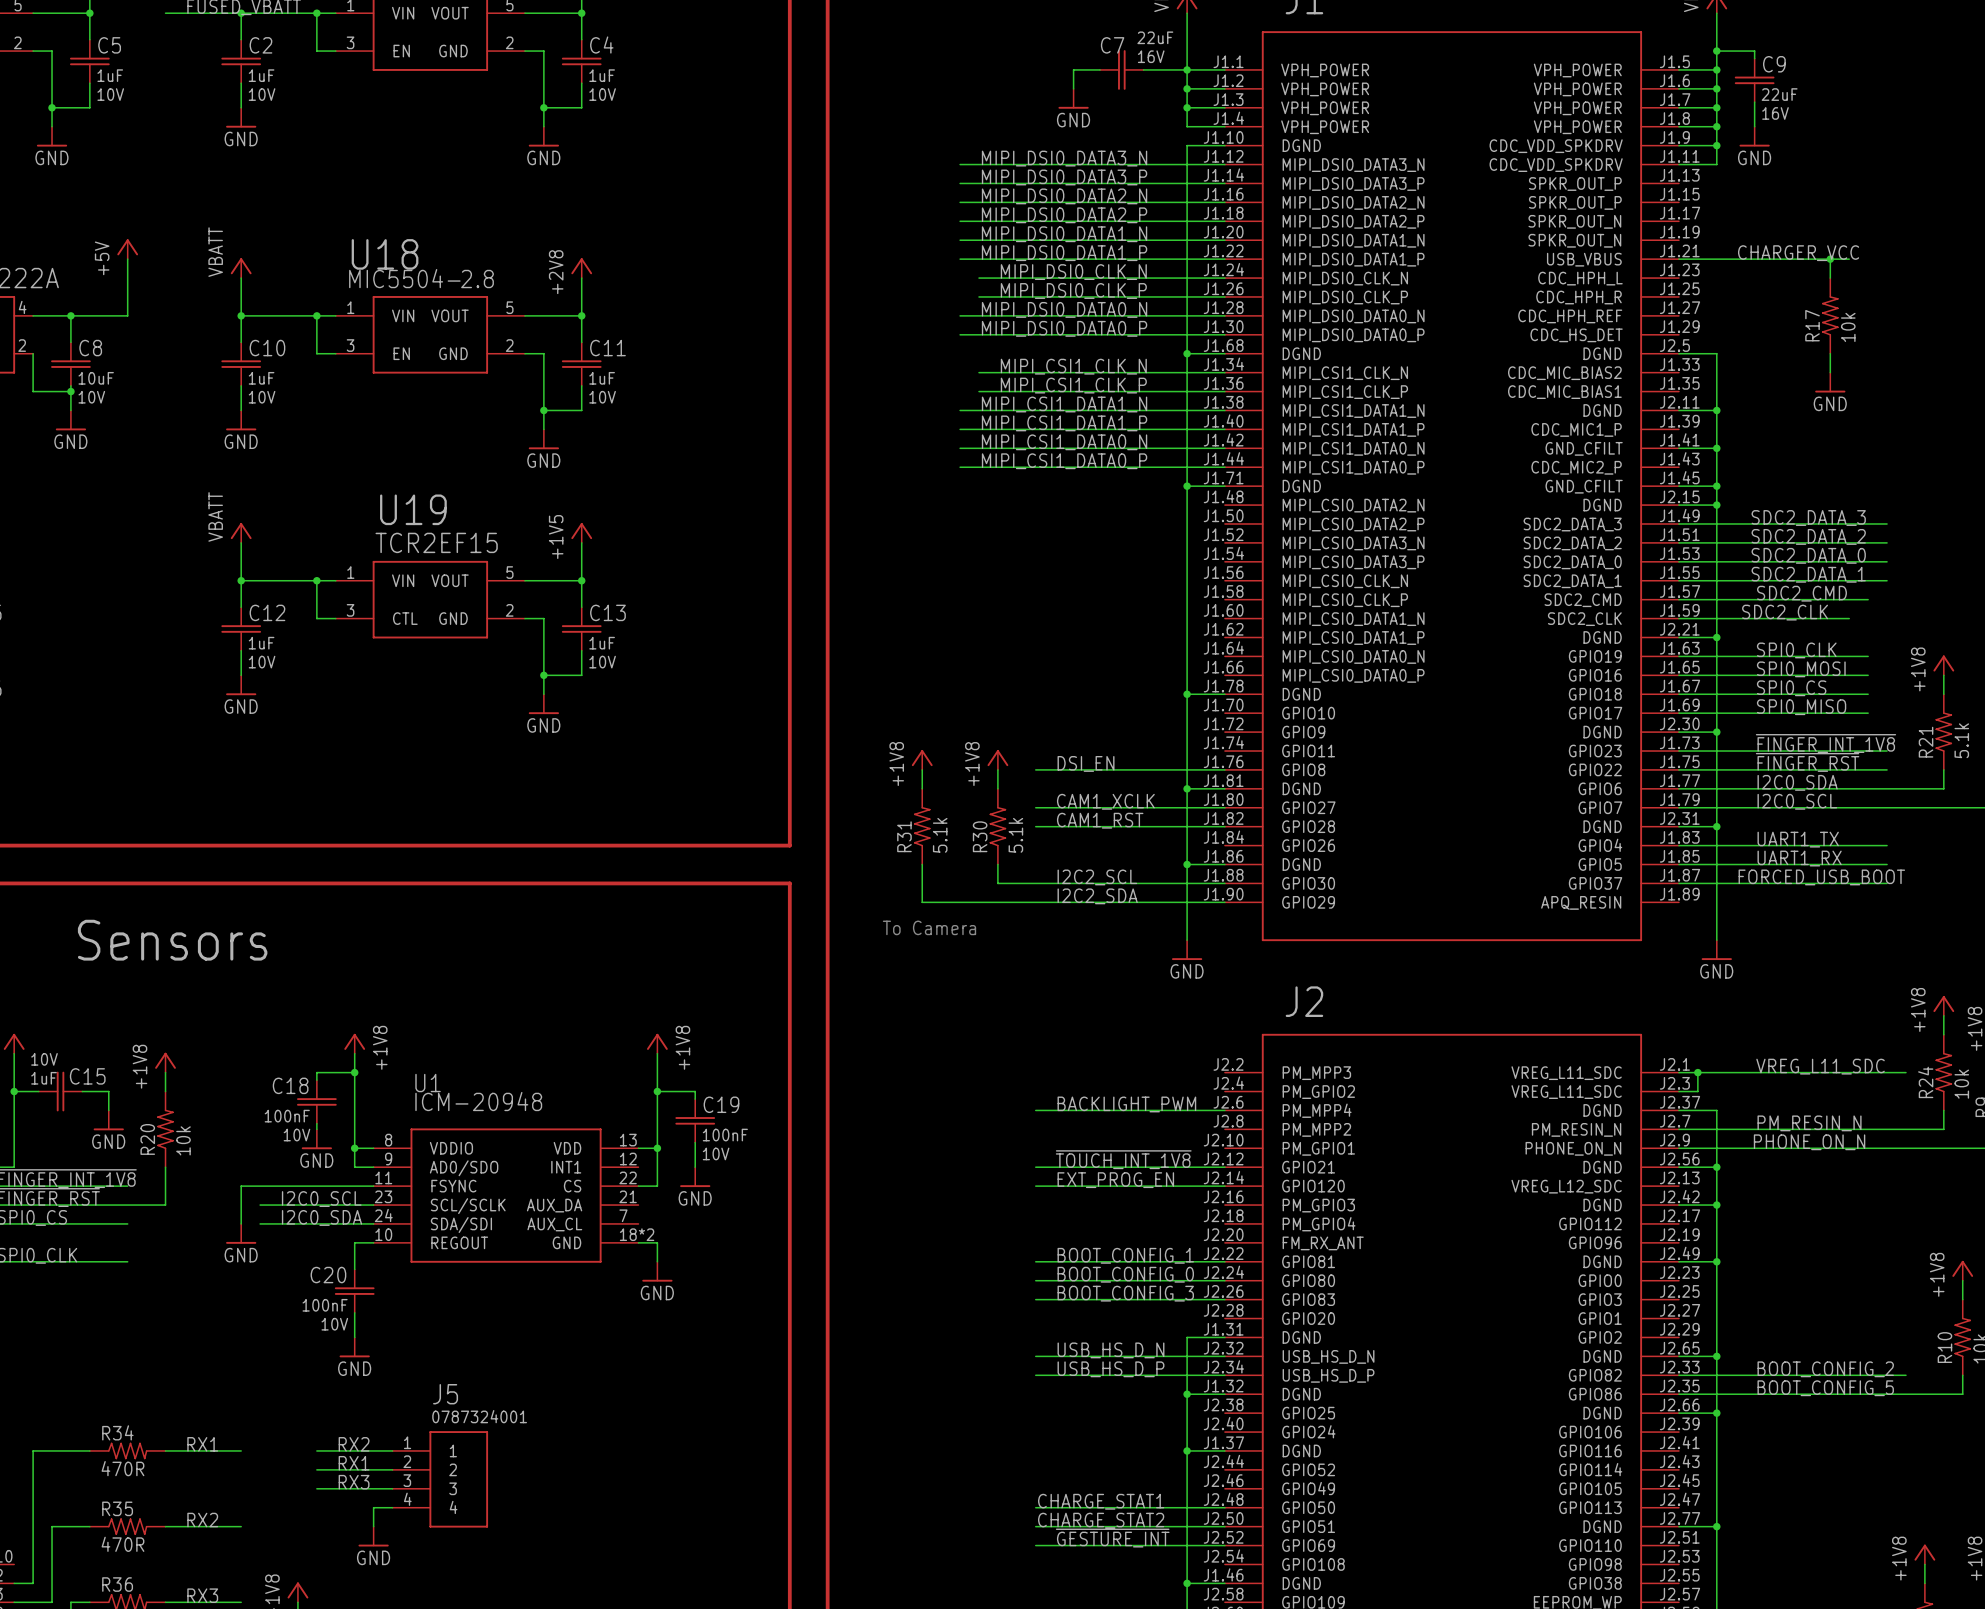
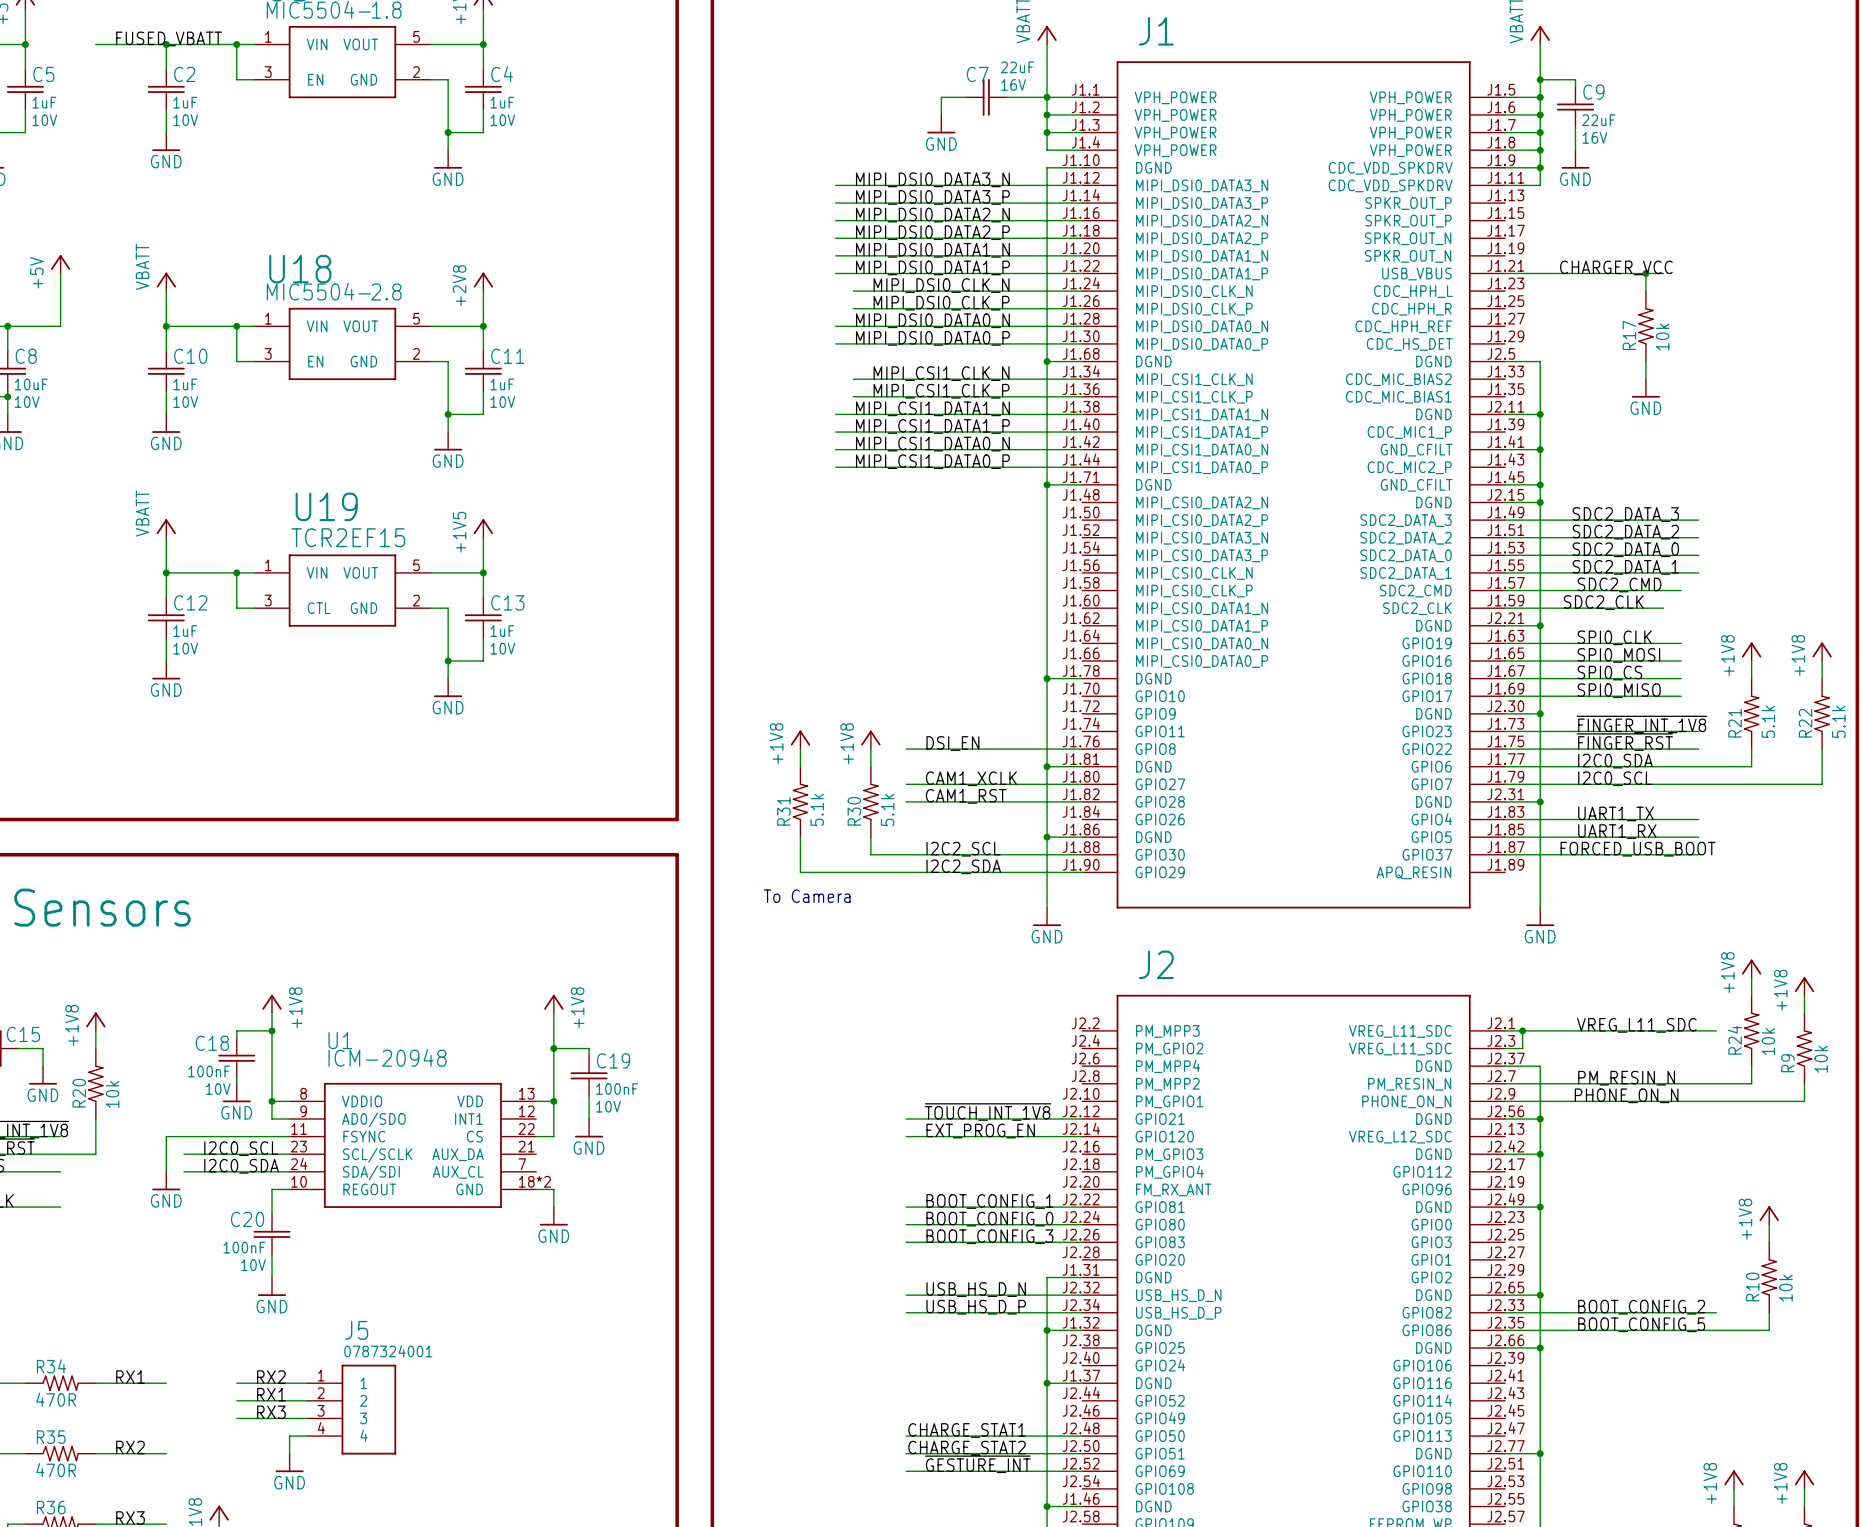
label: BACKLIGHT_PWM (1126, 1104) -> none
wire: (1035, 1110) (1224, 1110) -> none

